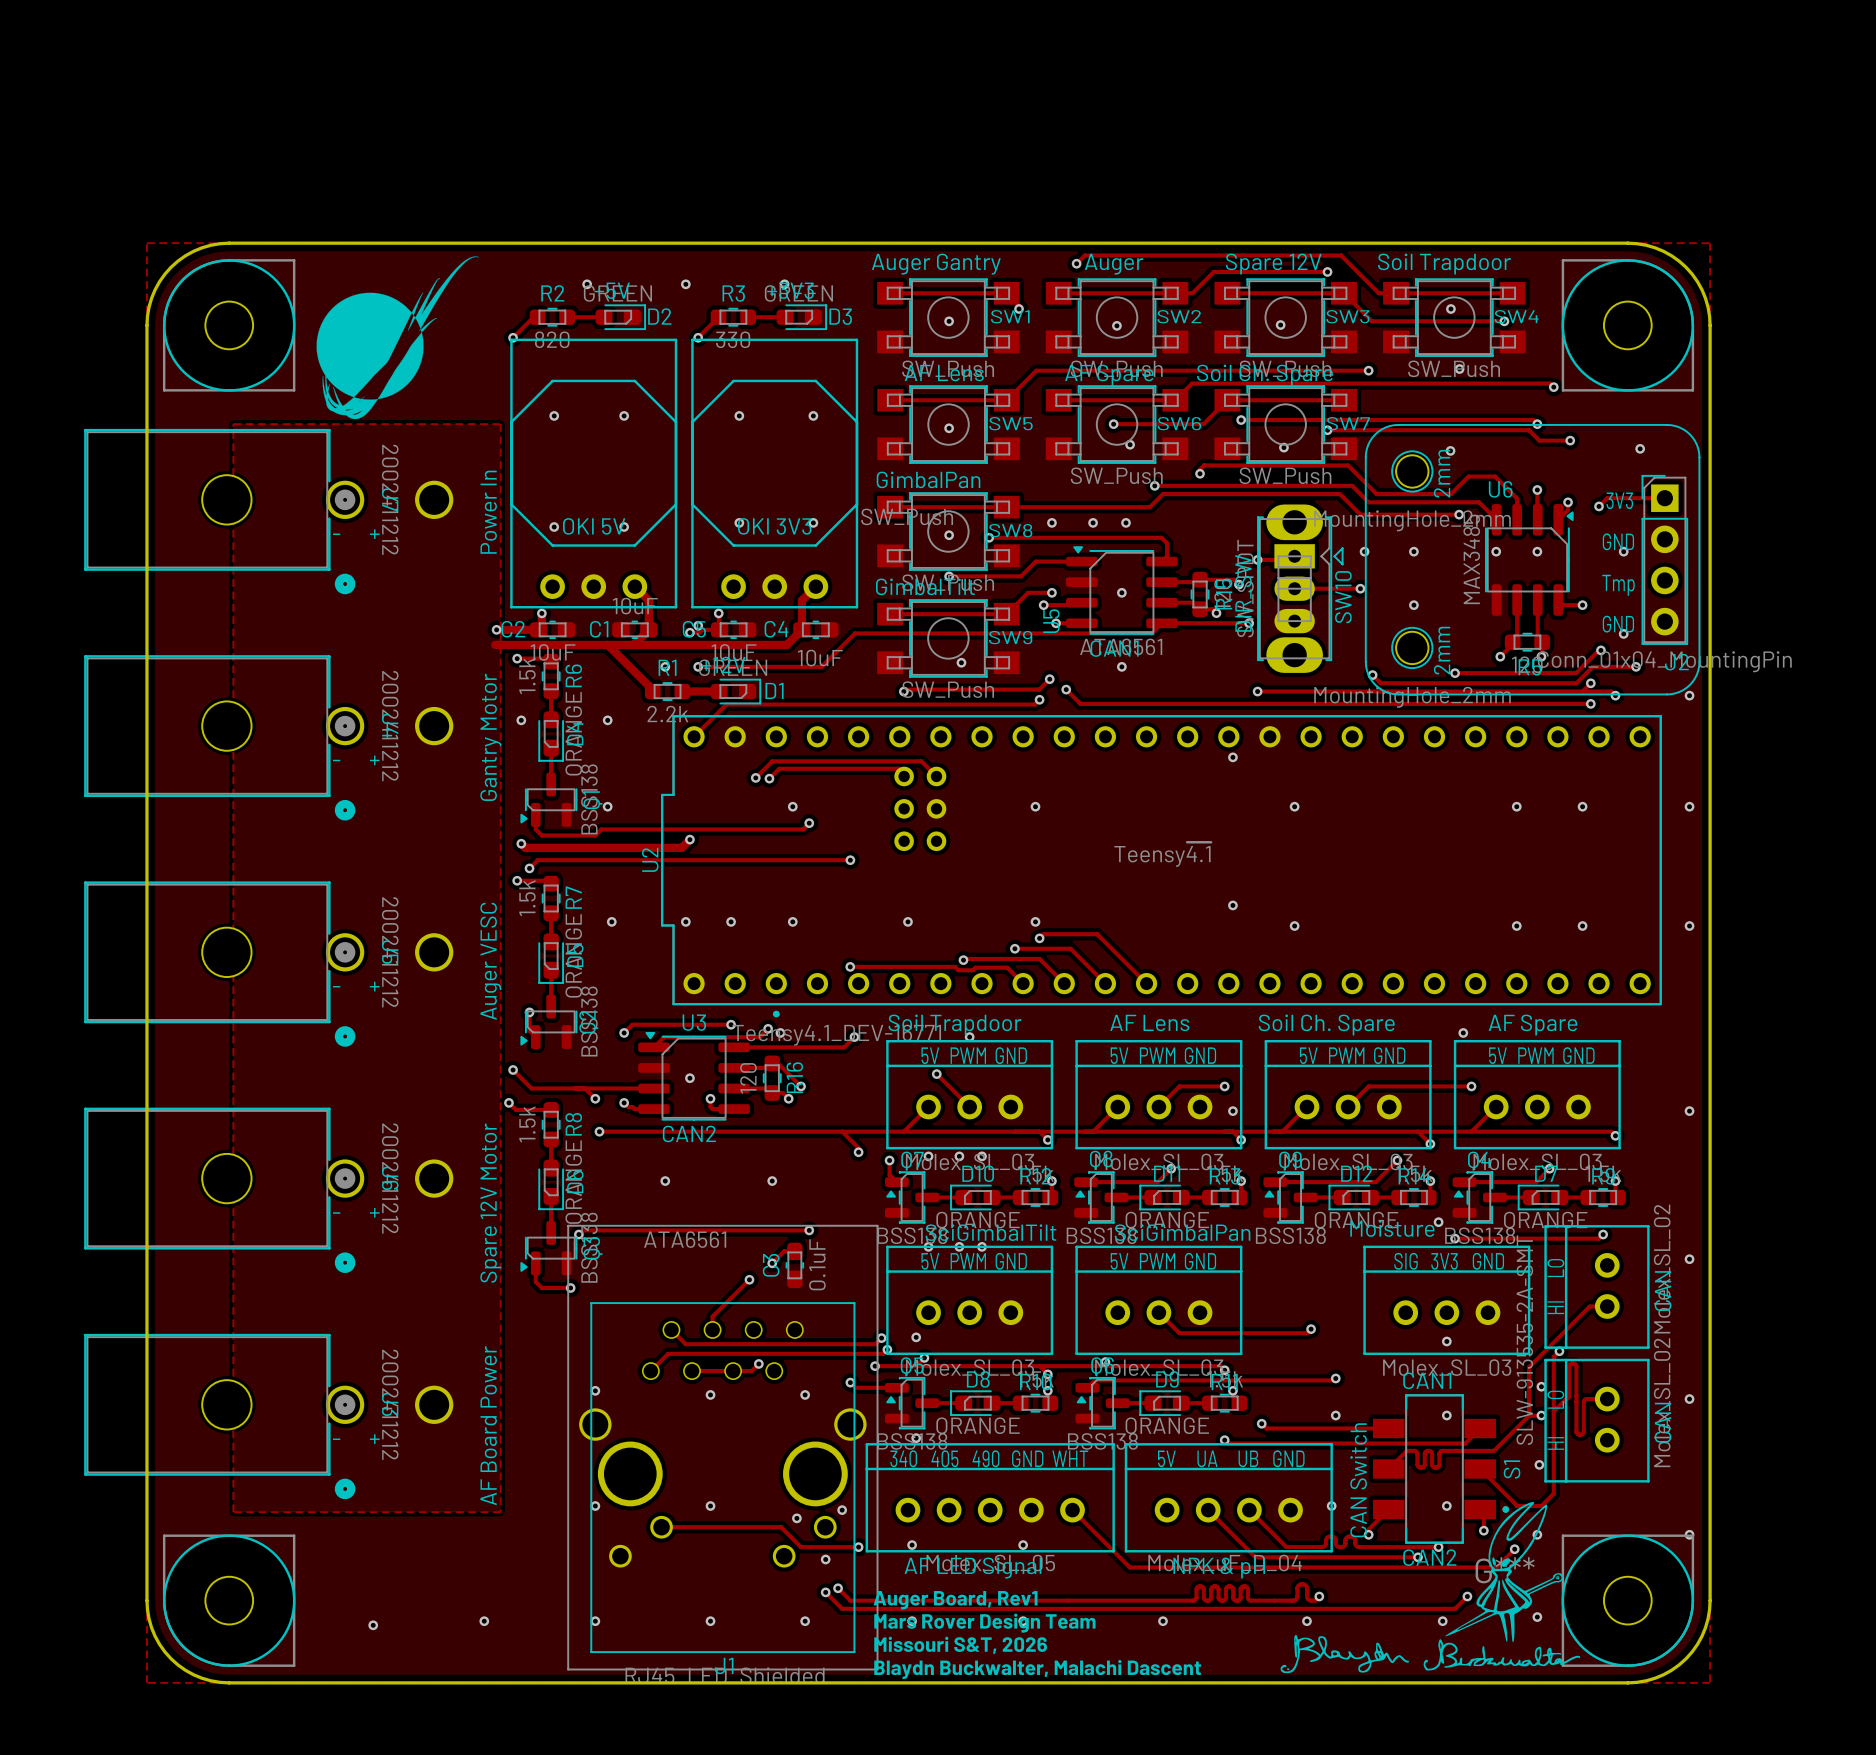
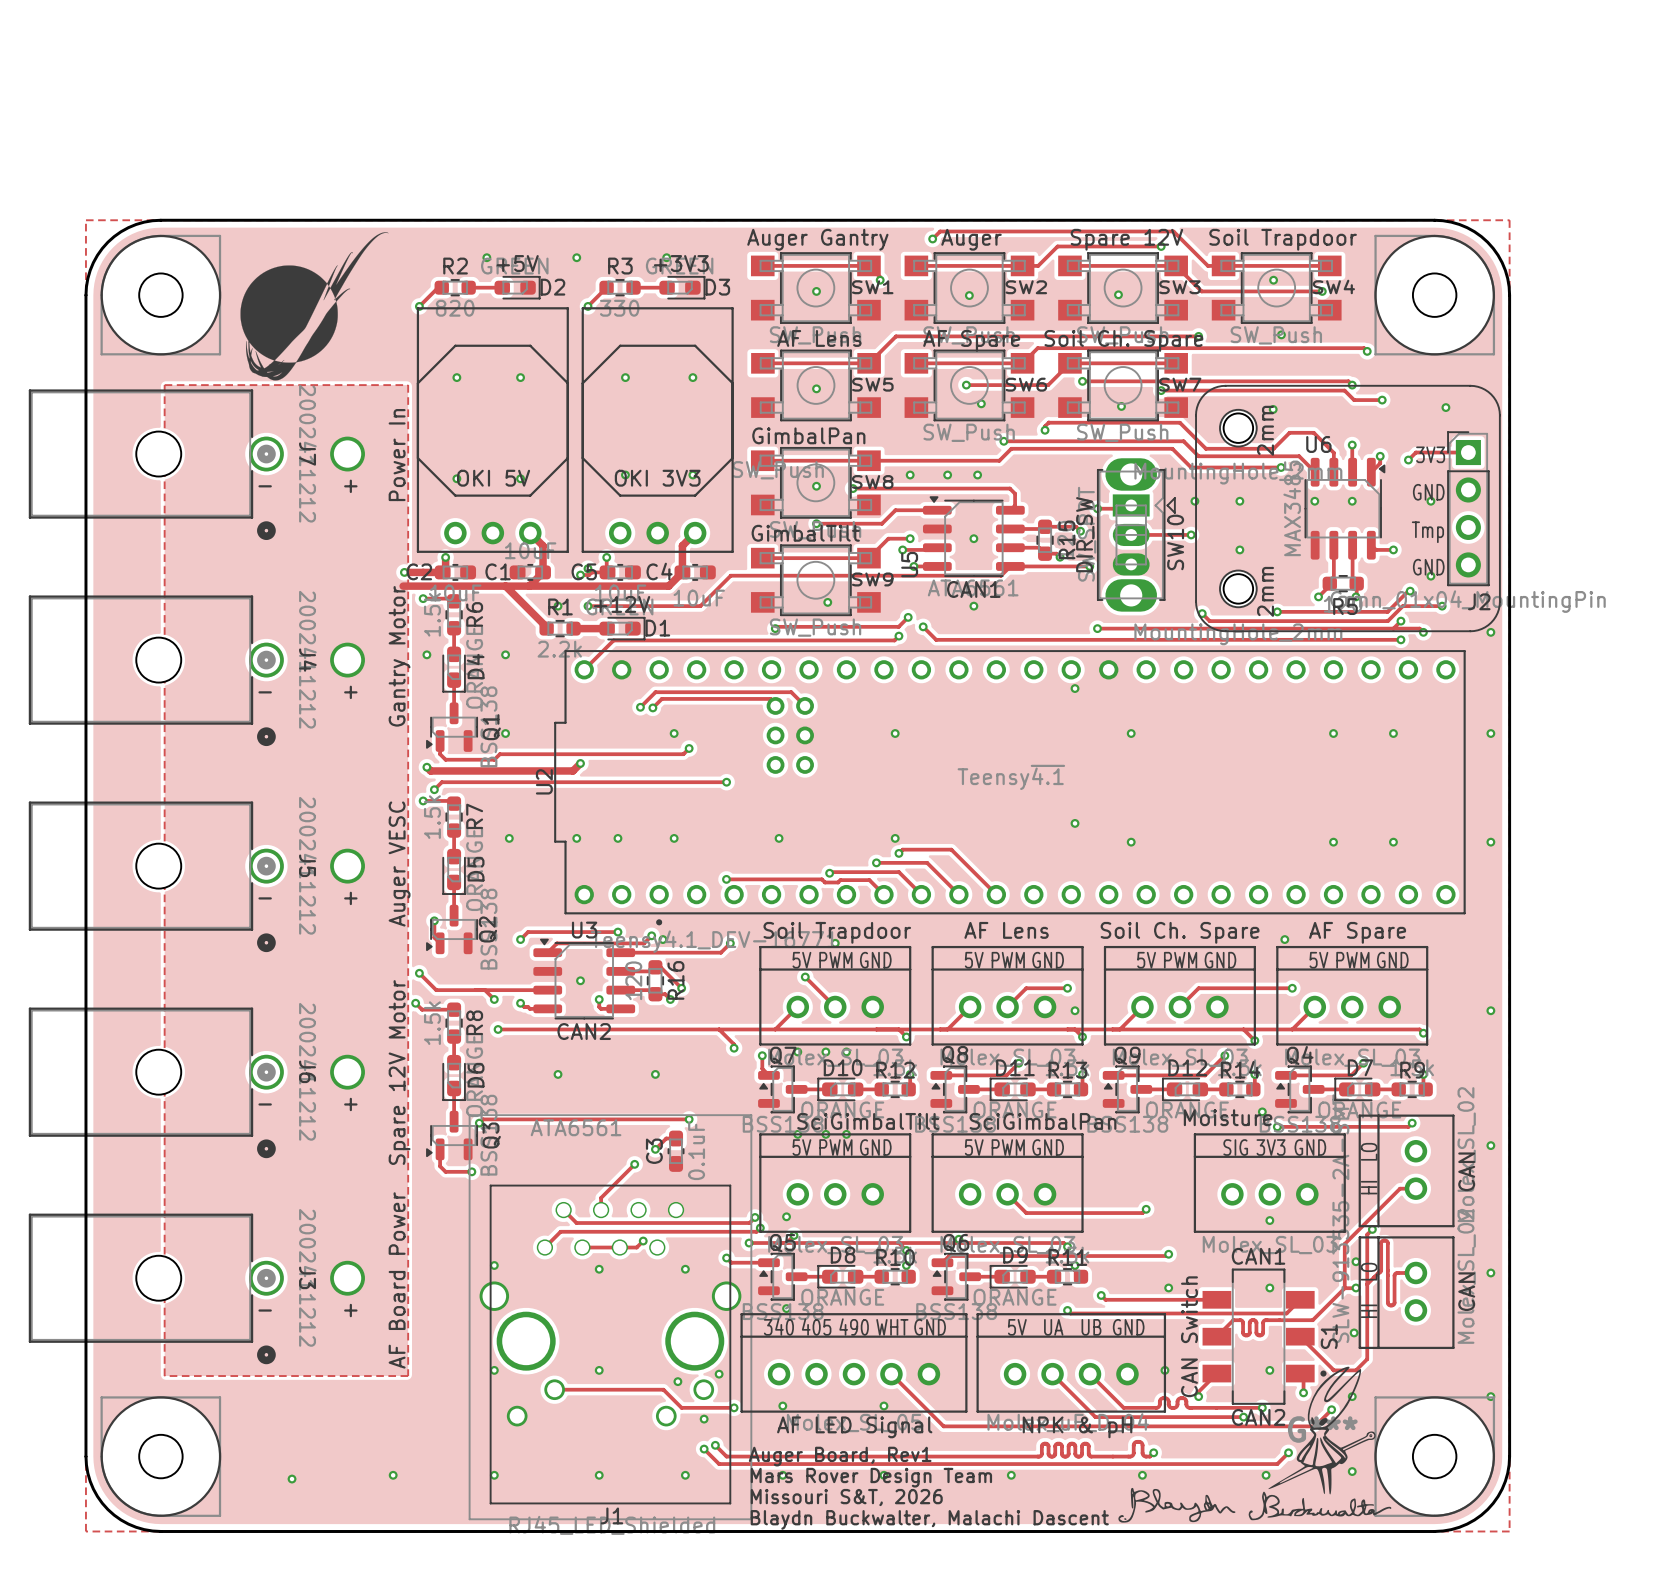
text: GND (1027, 1458) -> WHT (892, 1327)
text: WHT (1070, 1458) -> GND (930, 1327)
track: (1072, 1510) (1129, 1567) -> (891, 1374) (943, 1426) (981, 1426)

